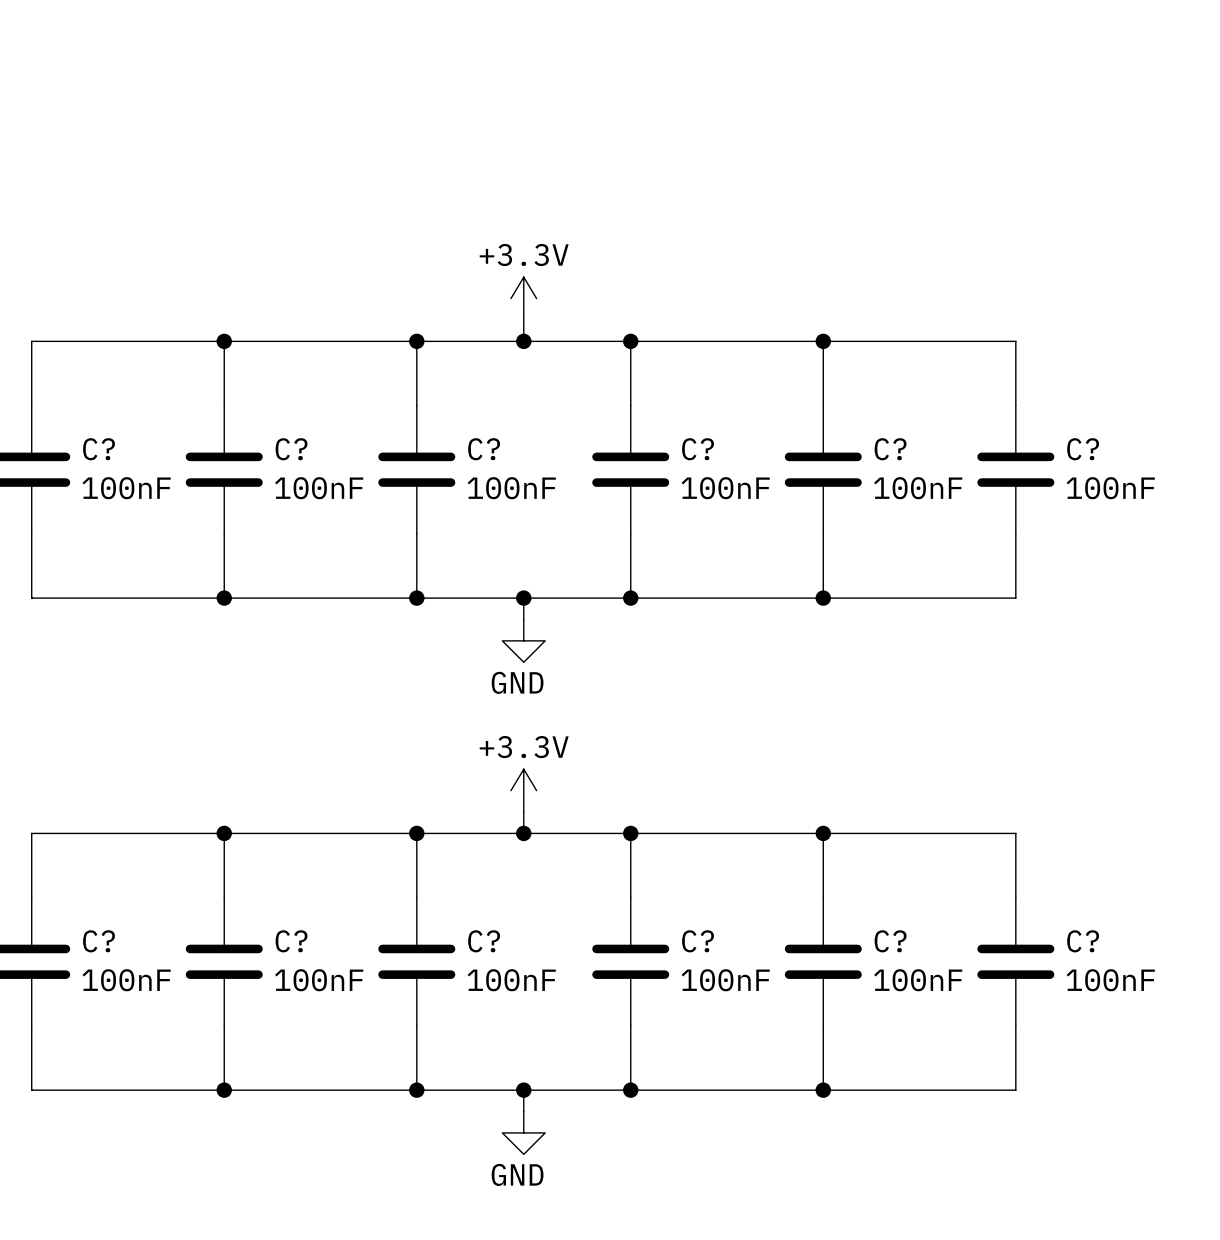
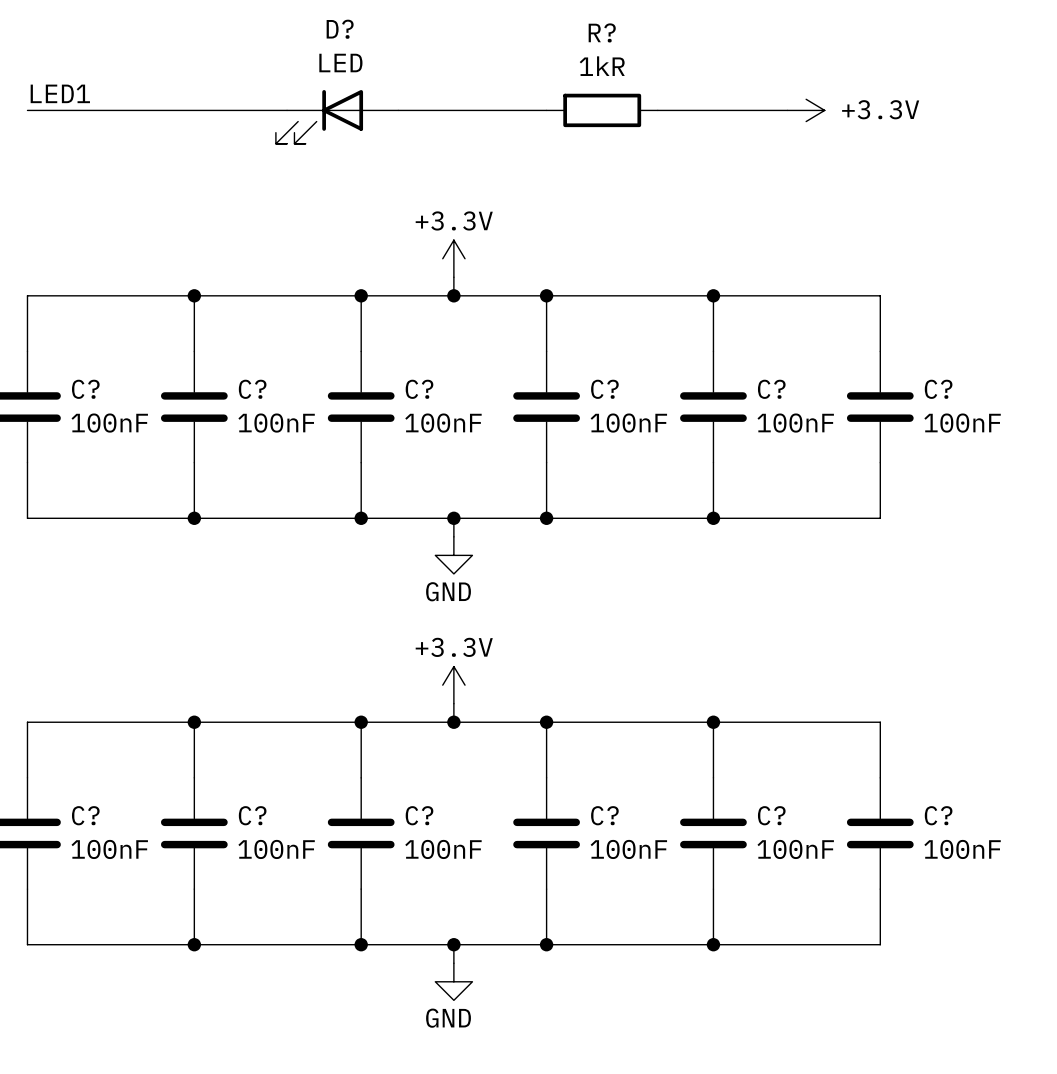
label: none -> LED1 (60, 93)
wire: none -> (27, 110) (287, 110)
wire: none -> (398, 110) (546, 110)
R?: none -> 1kR (602, 110)
wire: none -> (657, 110) (787, 110)
power symbol: none -> +3.3V (806, 110)
D?: none -> LED (337, 116)

